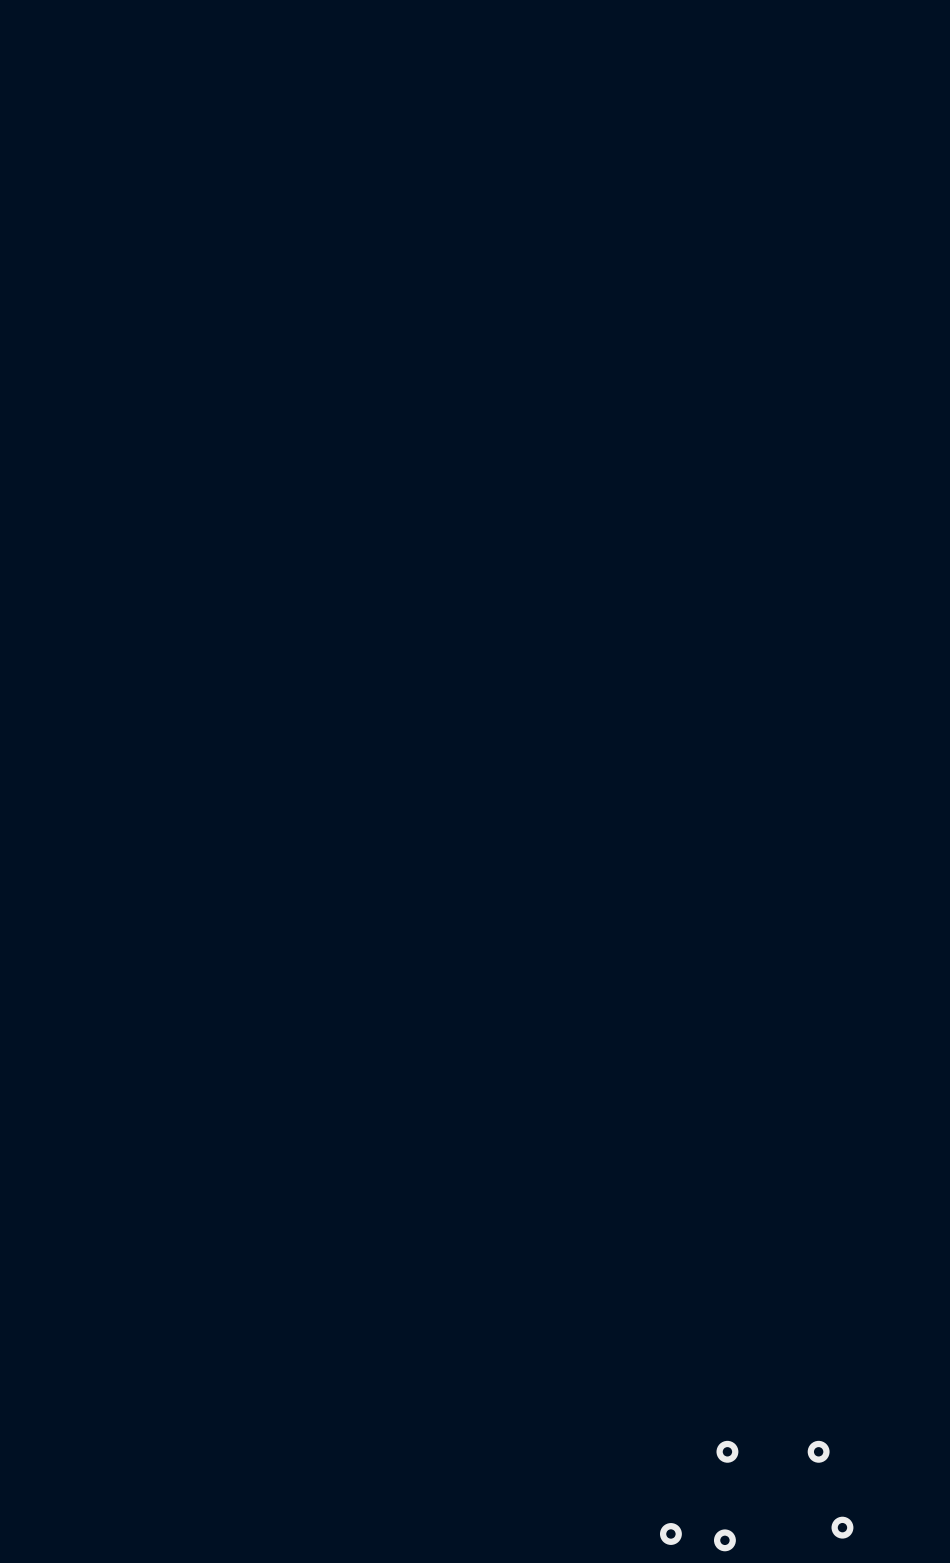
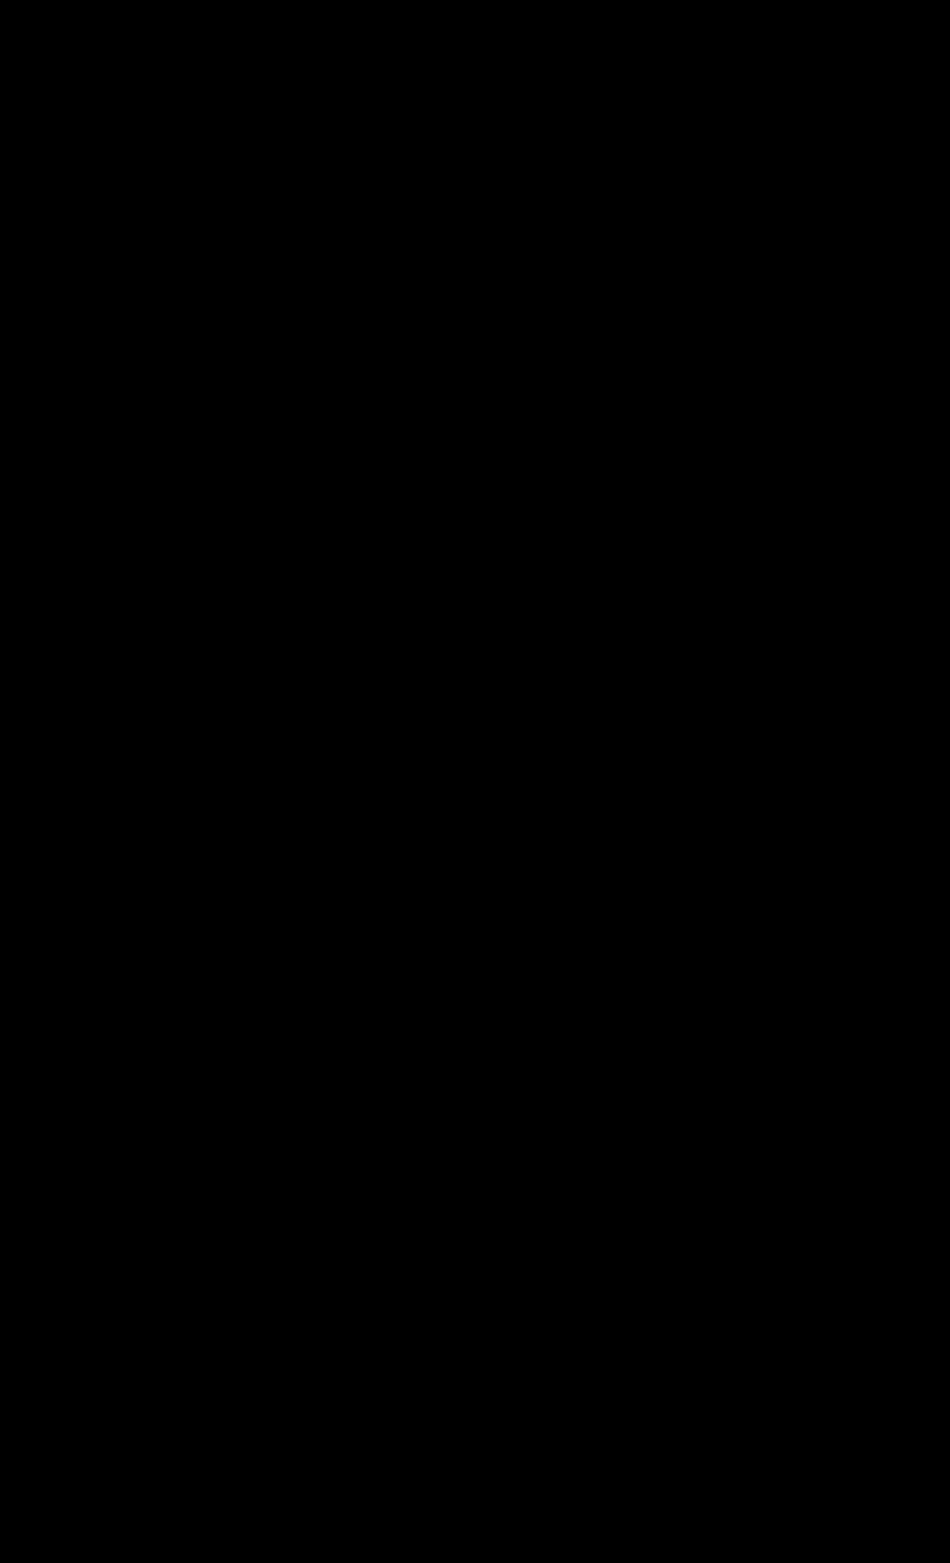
via: (727, 1451) -> none
via: (818, 1451) -> none
via: (842, 1527) -> none
via: (670, 1533) -> none
via: (724, 1540) -> none

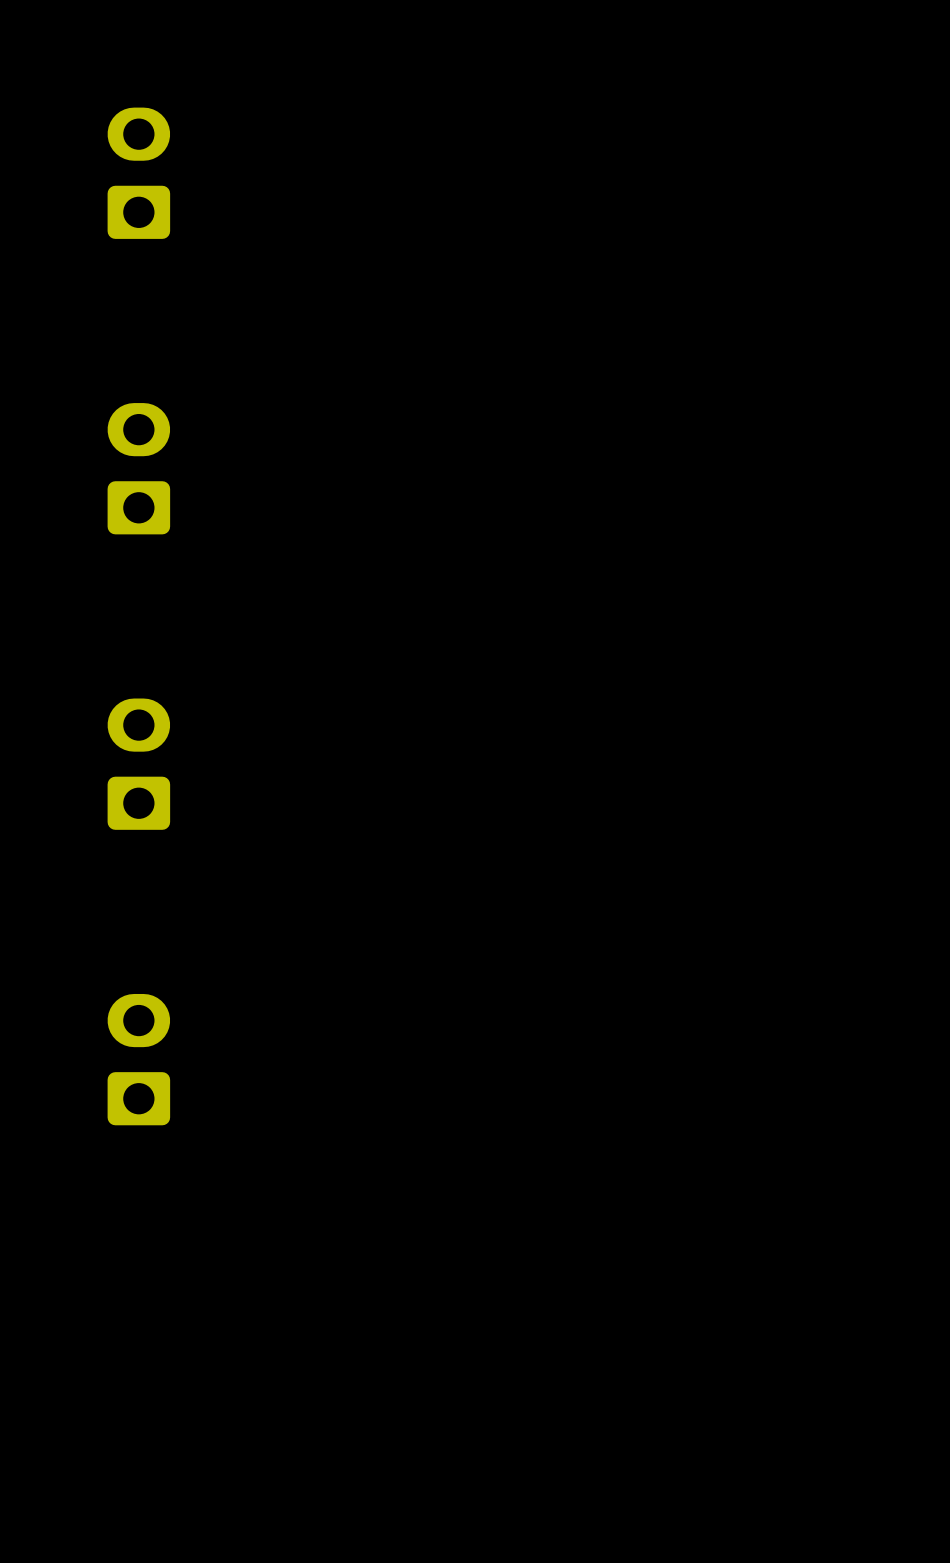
part: none -> (138, 173)
part: none -> (138, 468)
part: none -> (138, 764)
part: none -> (138, 1059)

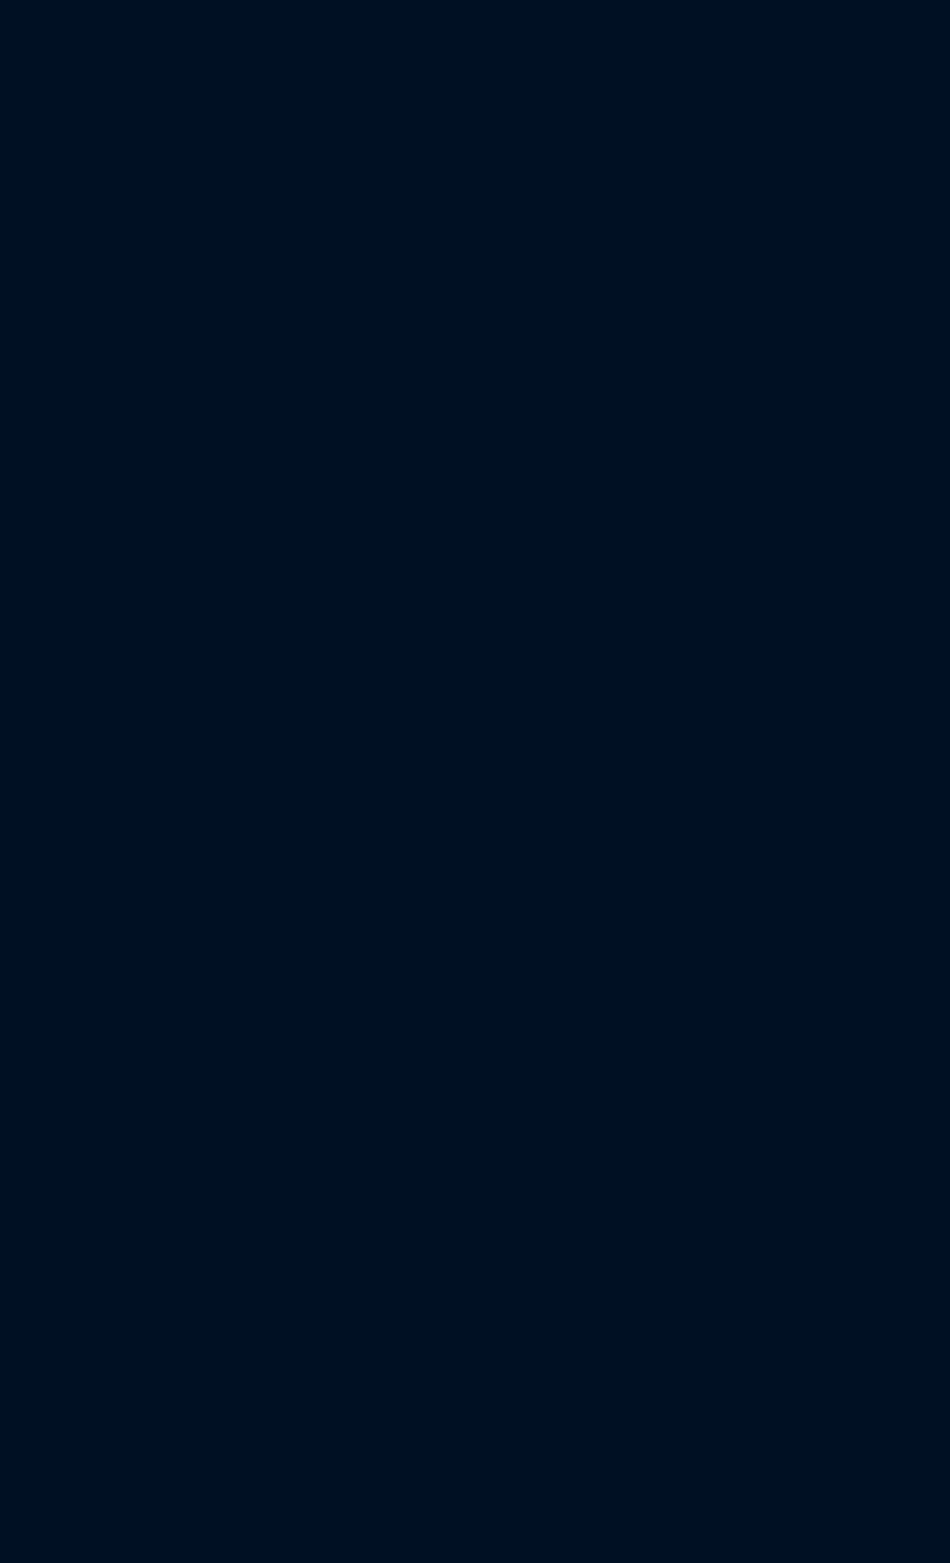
part: (138, 173) -> none
part: (138, 468) -> none
part: (138, 764) -> none
part: (138, 1059) -> none

